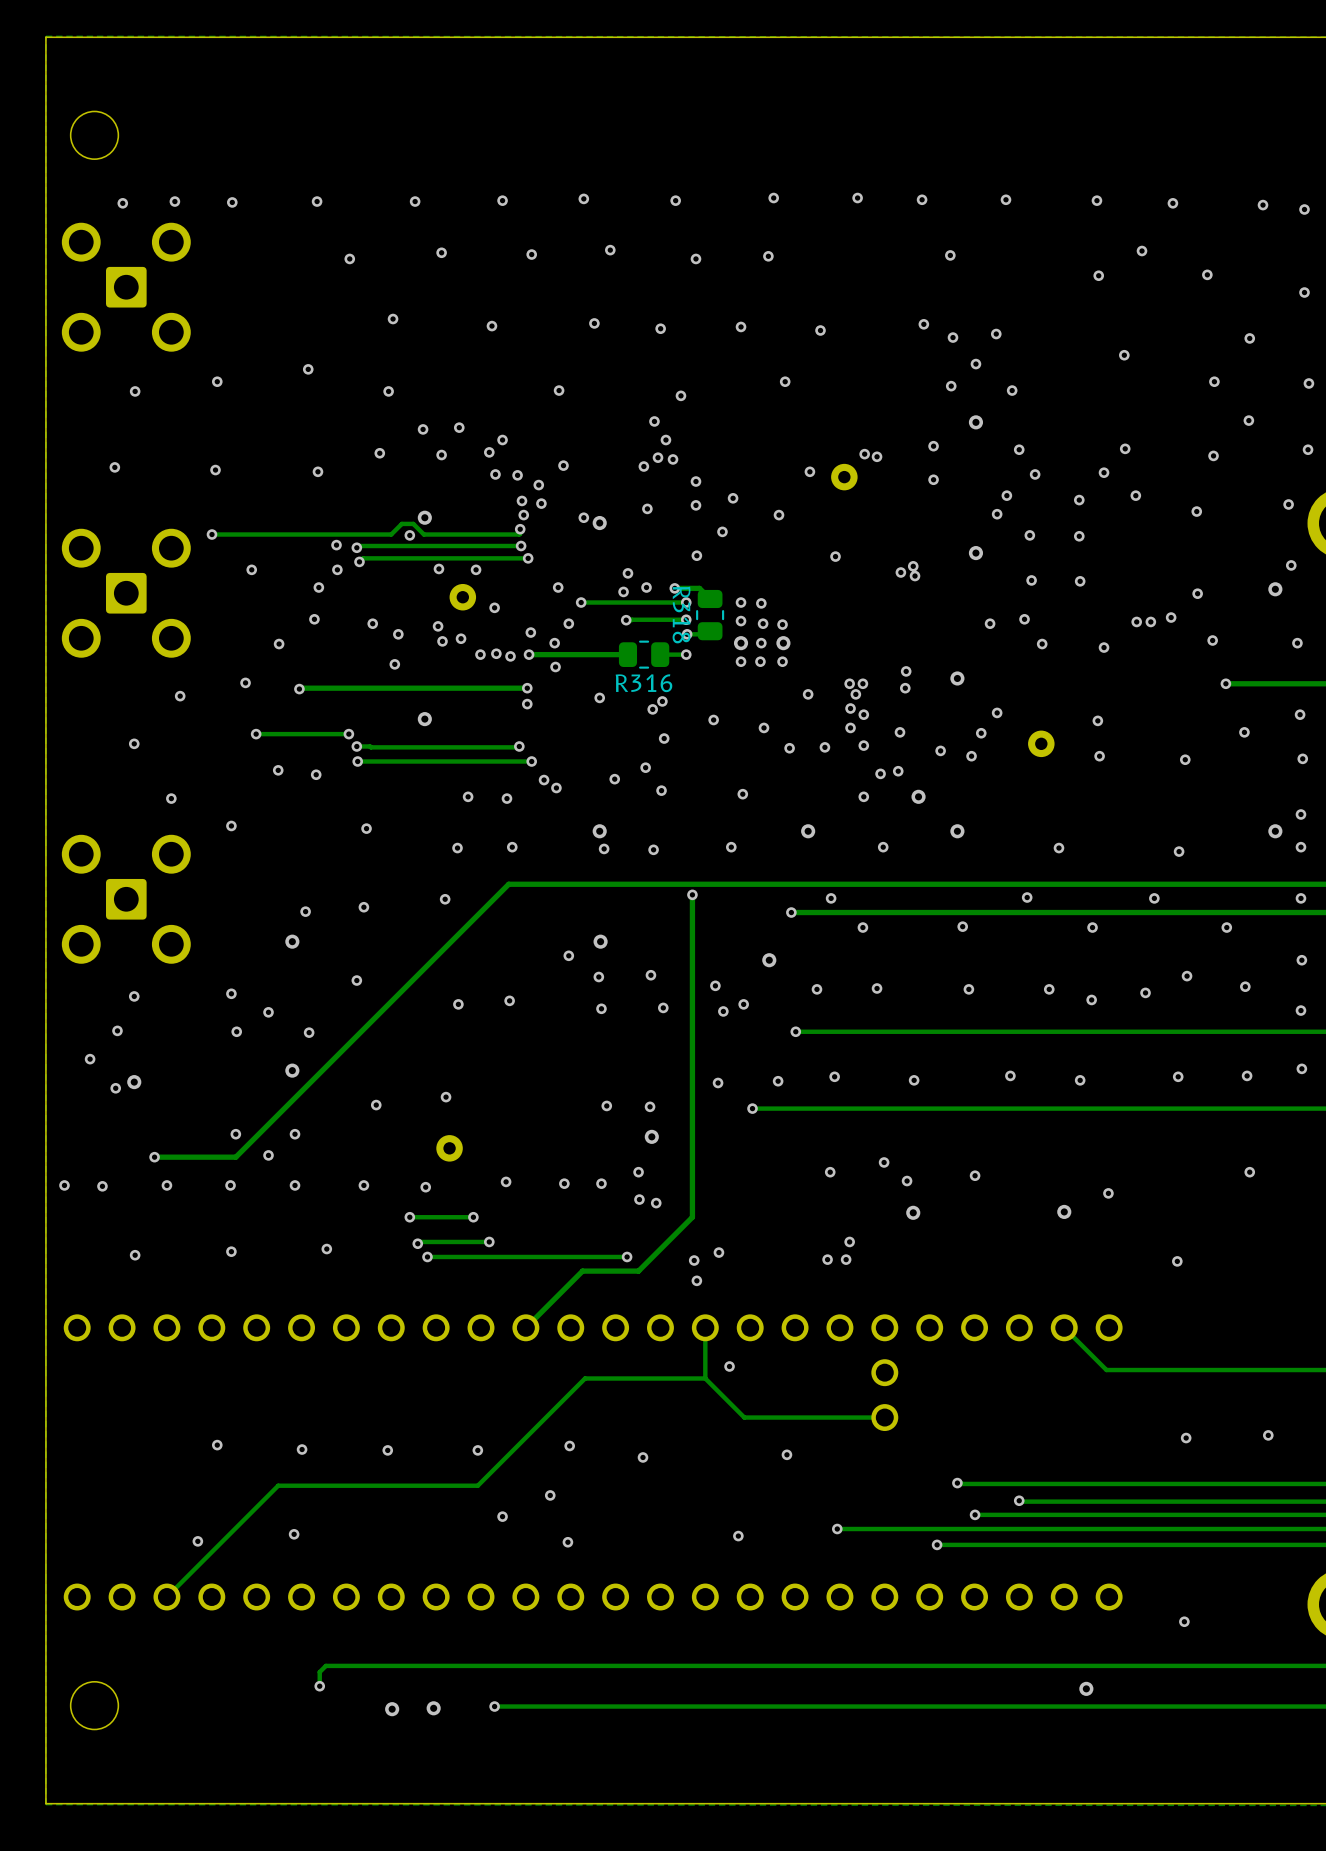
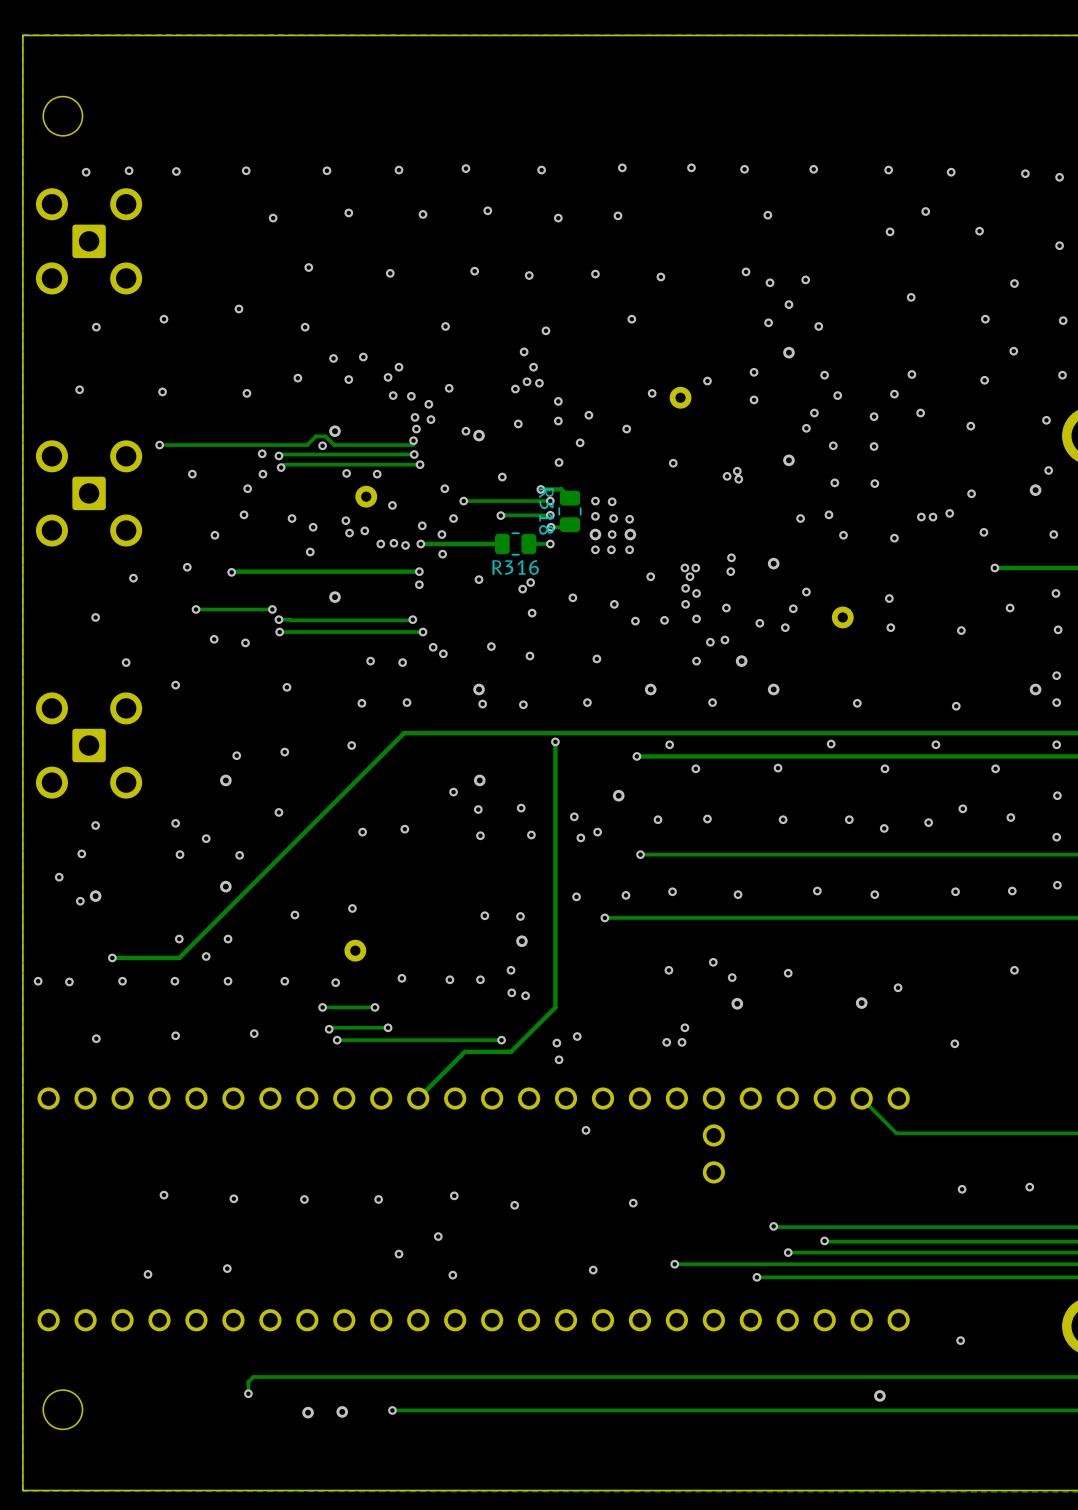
via: (864, 454) -> none
via: (646, 587) -> none
via: (623, 591) -> none
via: (645, 767) -> none
track: (705, 1327) (705, 1378) -> none
track: (705, 1378) (585, 1378) (477, 1485) (278, 1485) (166, 1597) -> none
track: (705, 1378) (744, 1417) (884, 1417) -> none

